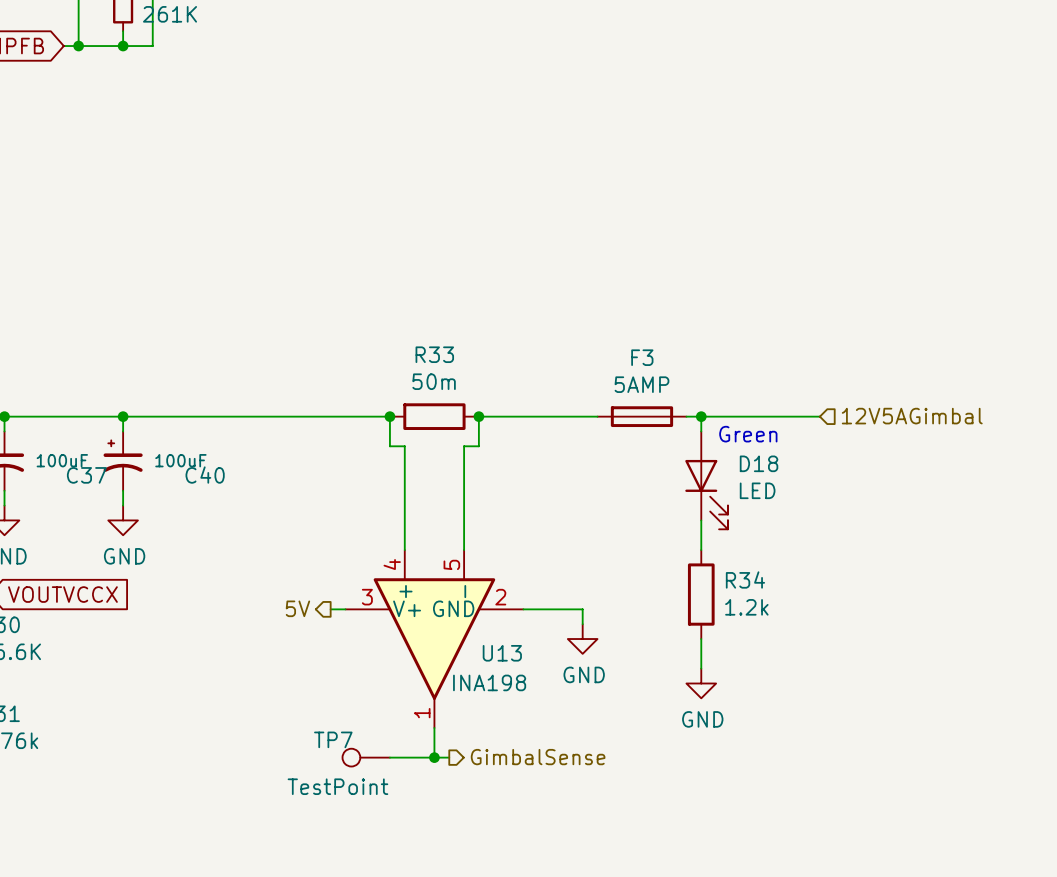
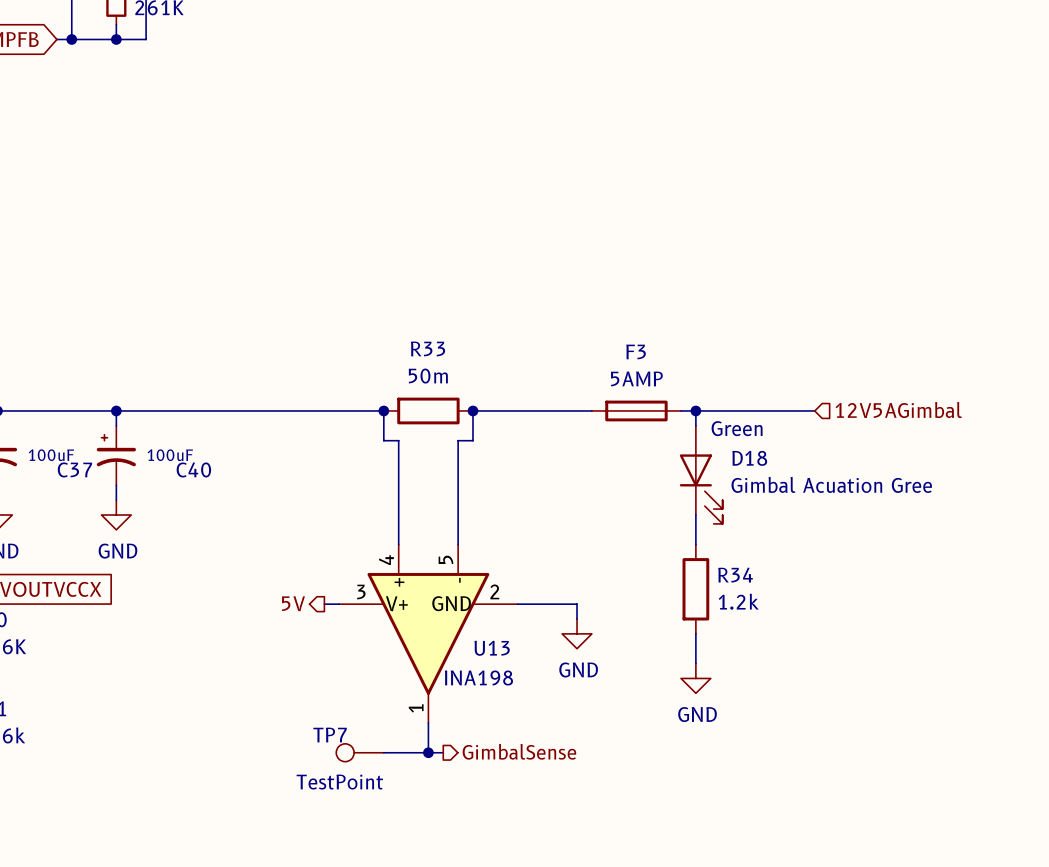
D18 value: LED (757, 490) -> Gimbal Acuation Gree (831, 484)

